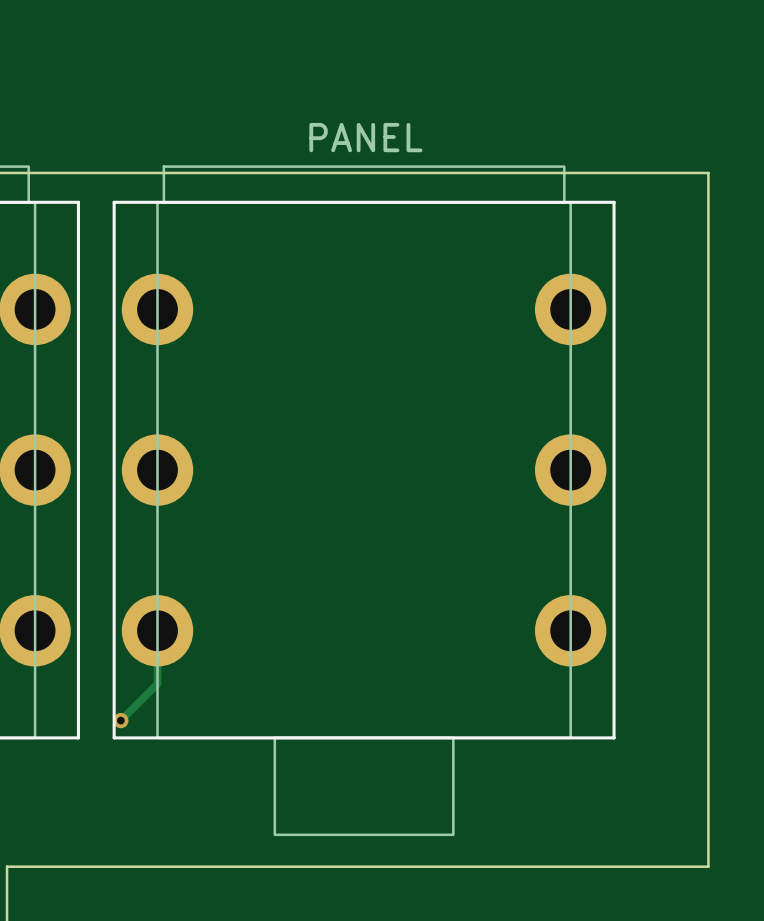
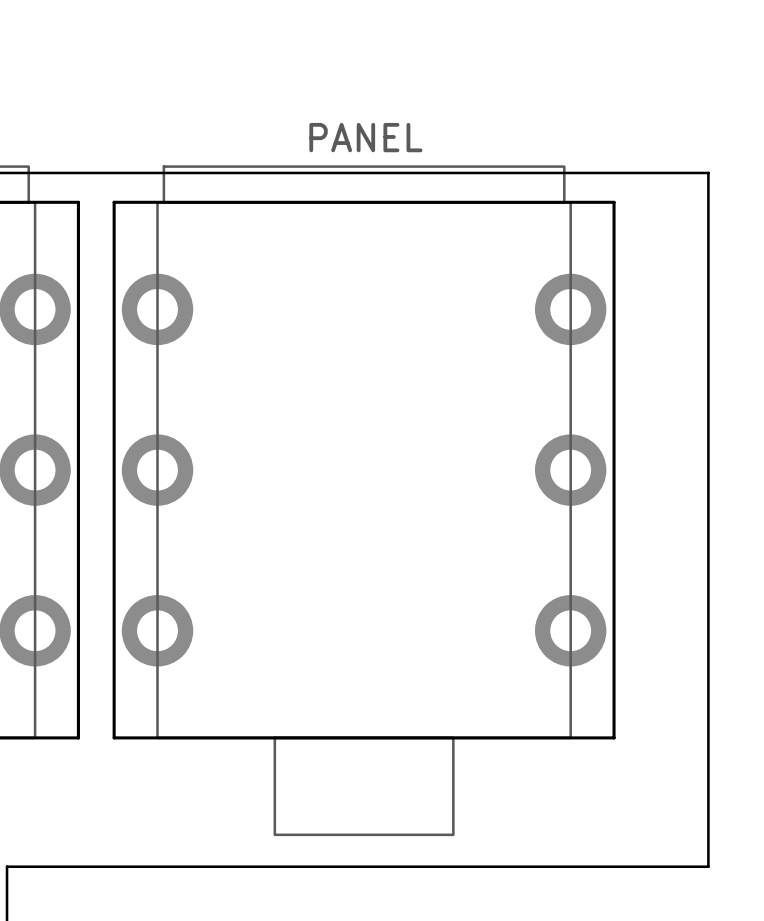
track: (157, 630) (157, 683) (120, 720) -> none
via: (120, 720) -> none

